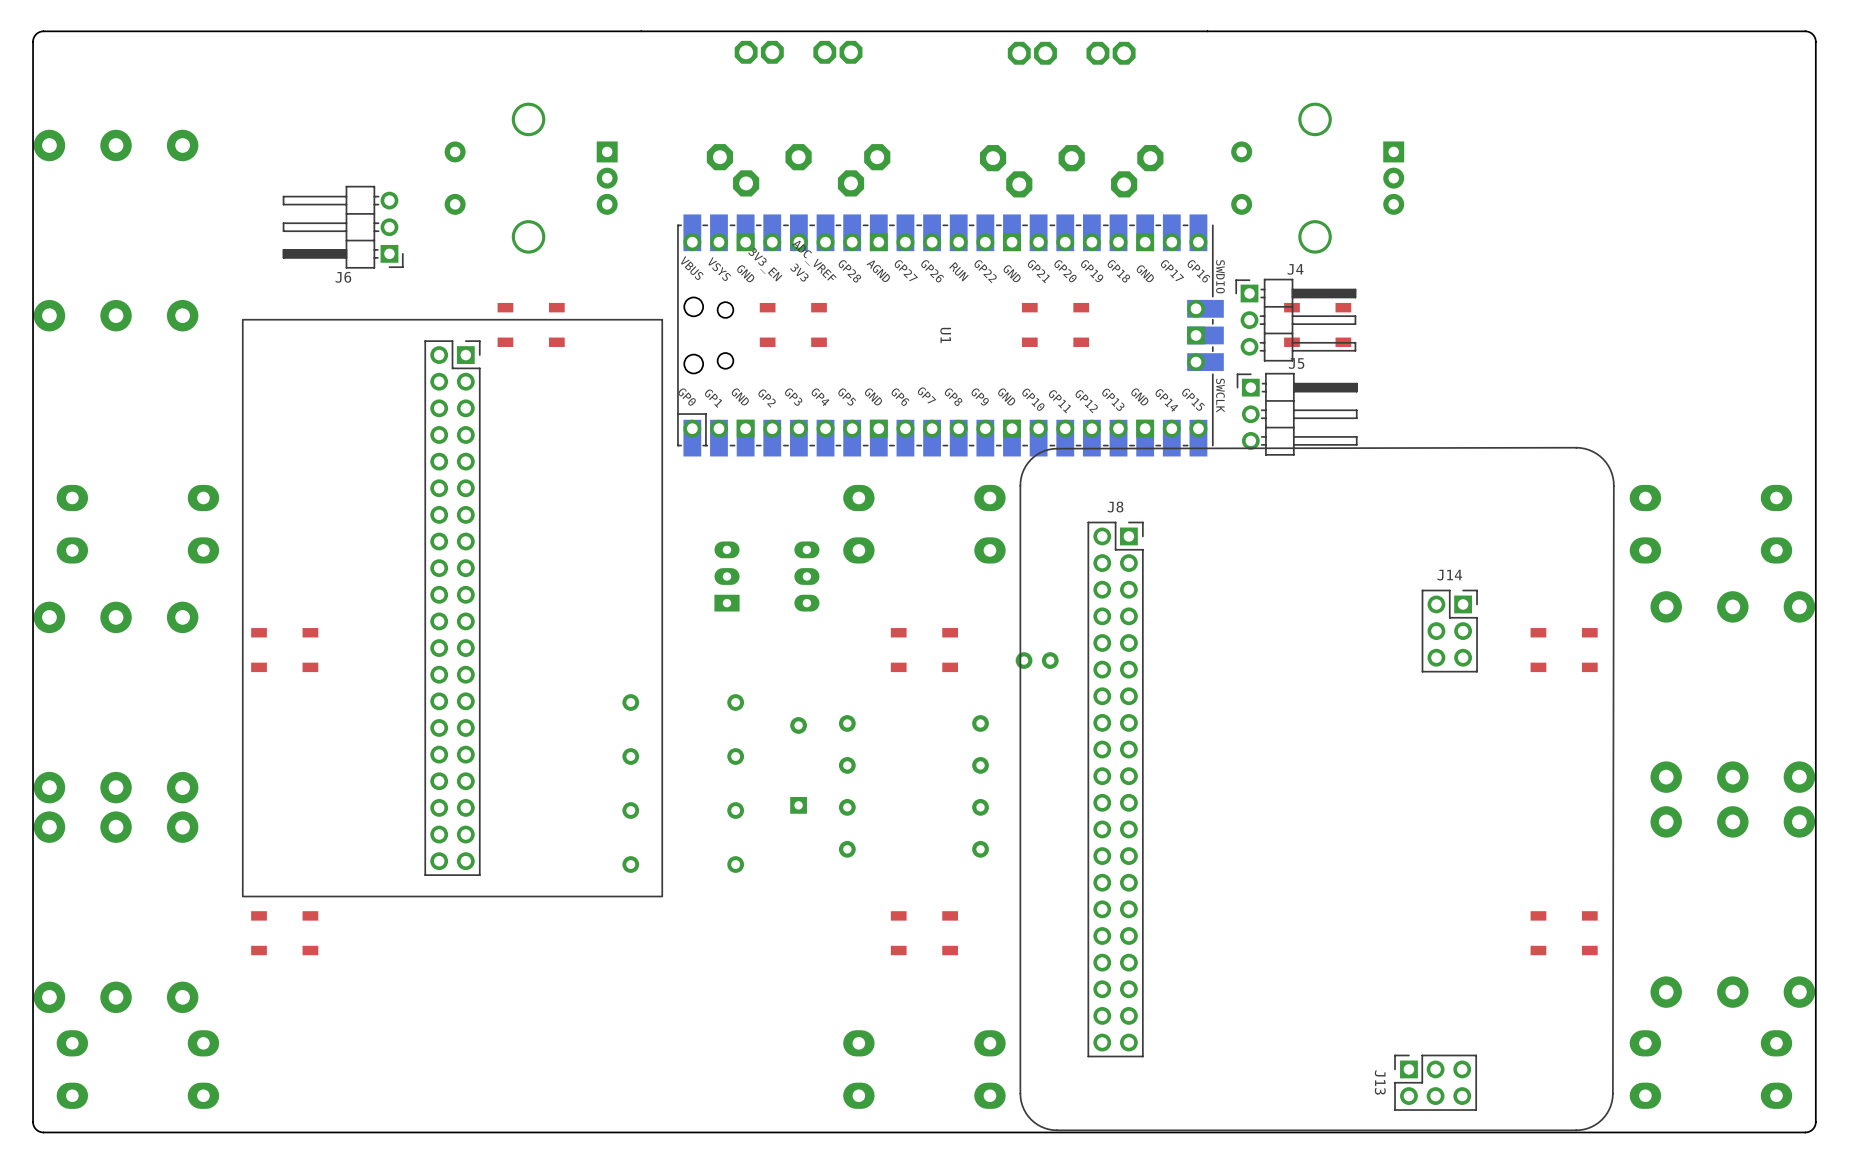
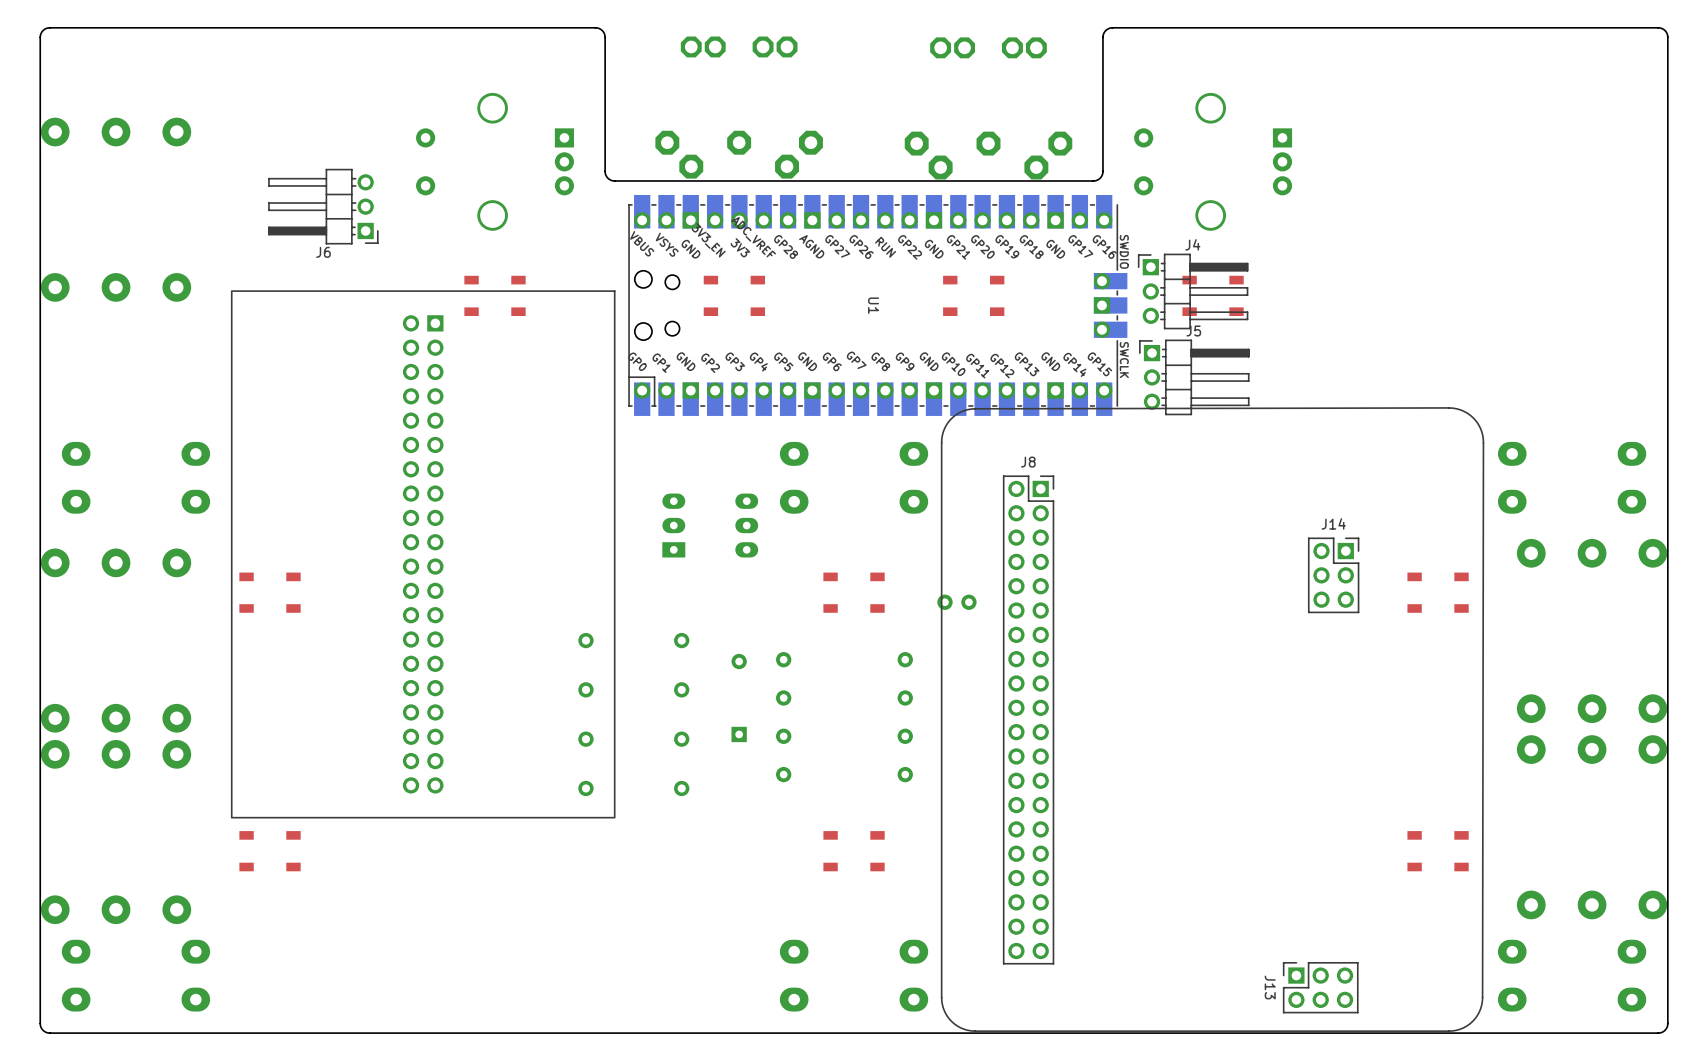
board edge: (1207, 31) (641, 31) -> (1112, 27) (1105, 30) (1103, 36) (1102, 172) (1100, 178) (1093, 181) (611, 180) (606, 176) (605, 171) (605, 36) (602, 30) (595, 27)
part footprint: [242, 319, 663, 898] -> [231, 290, 616, 819]

